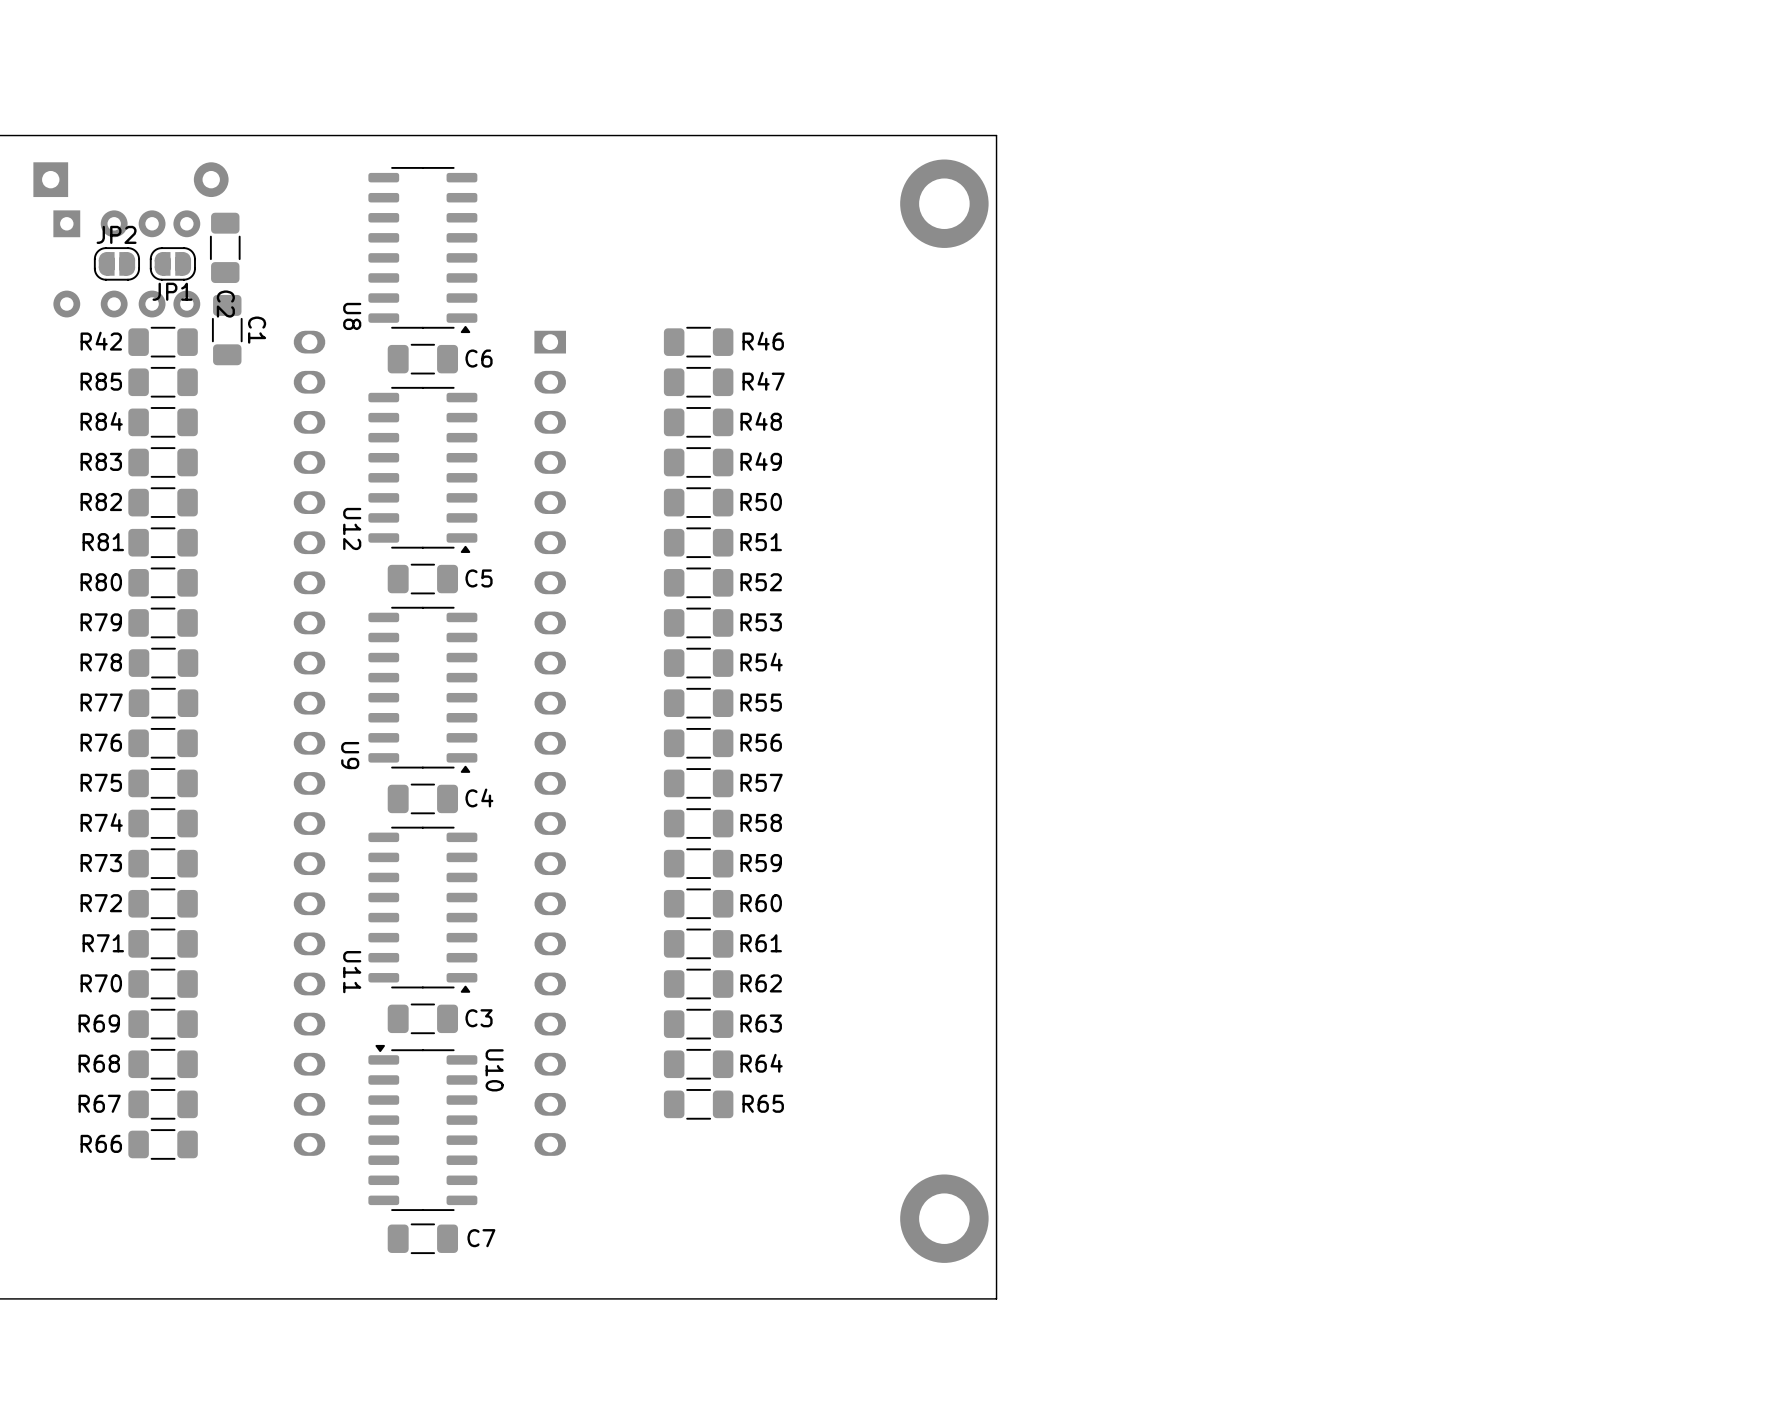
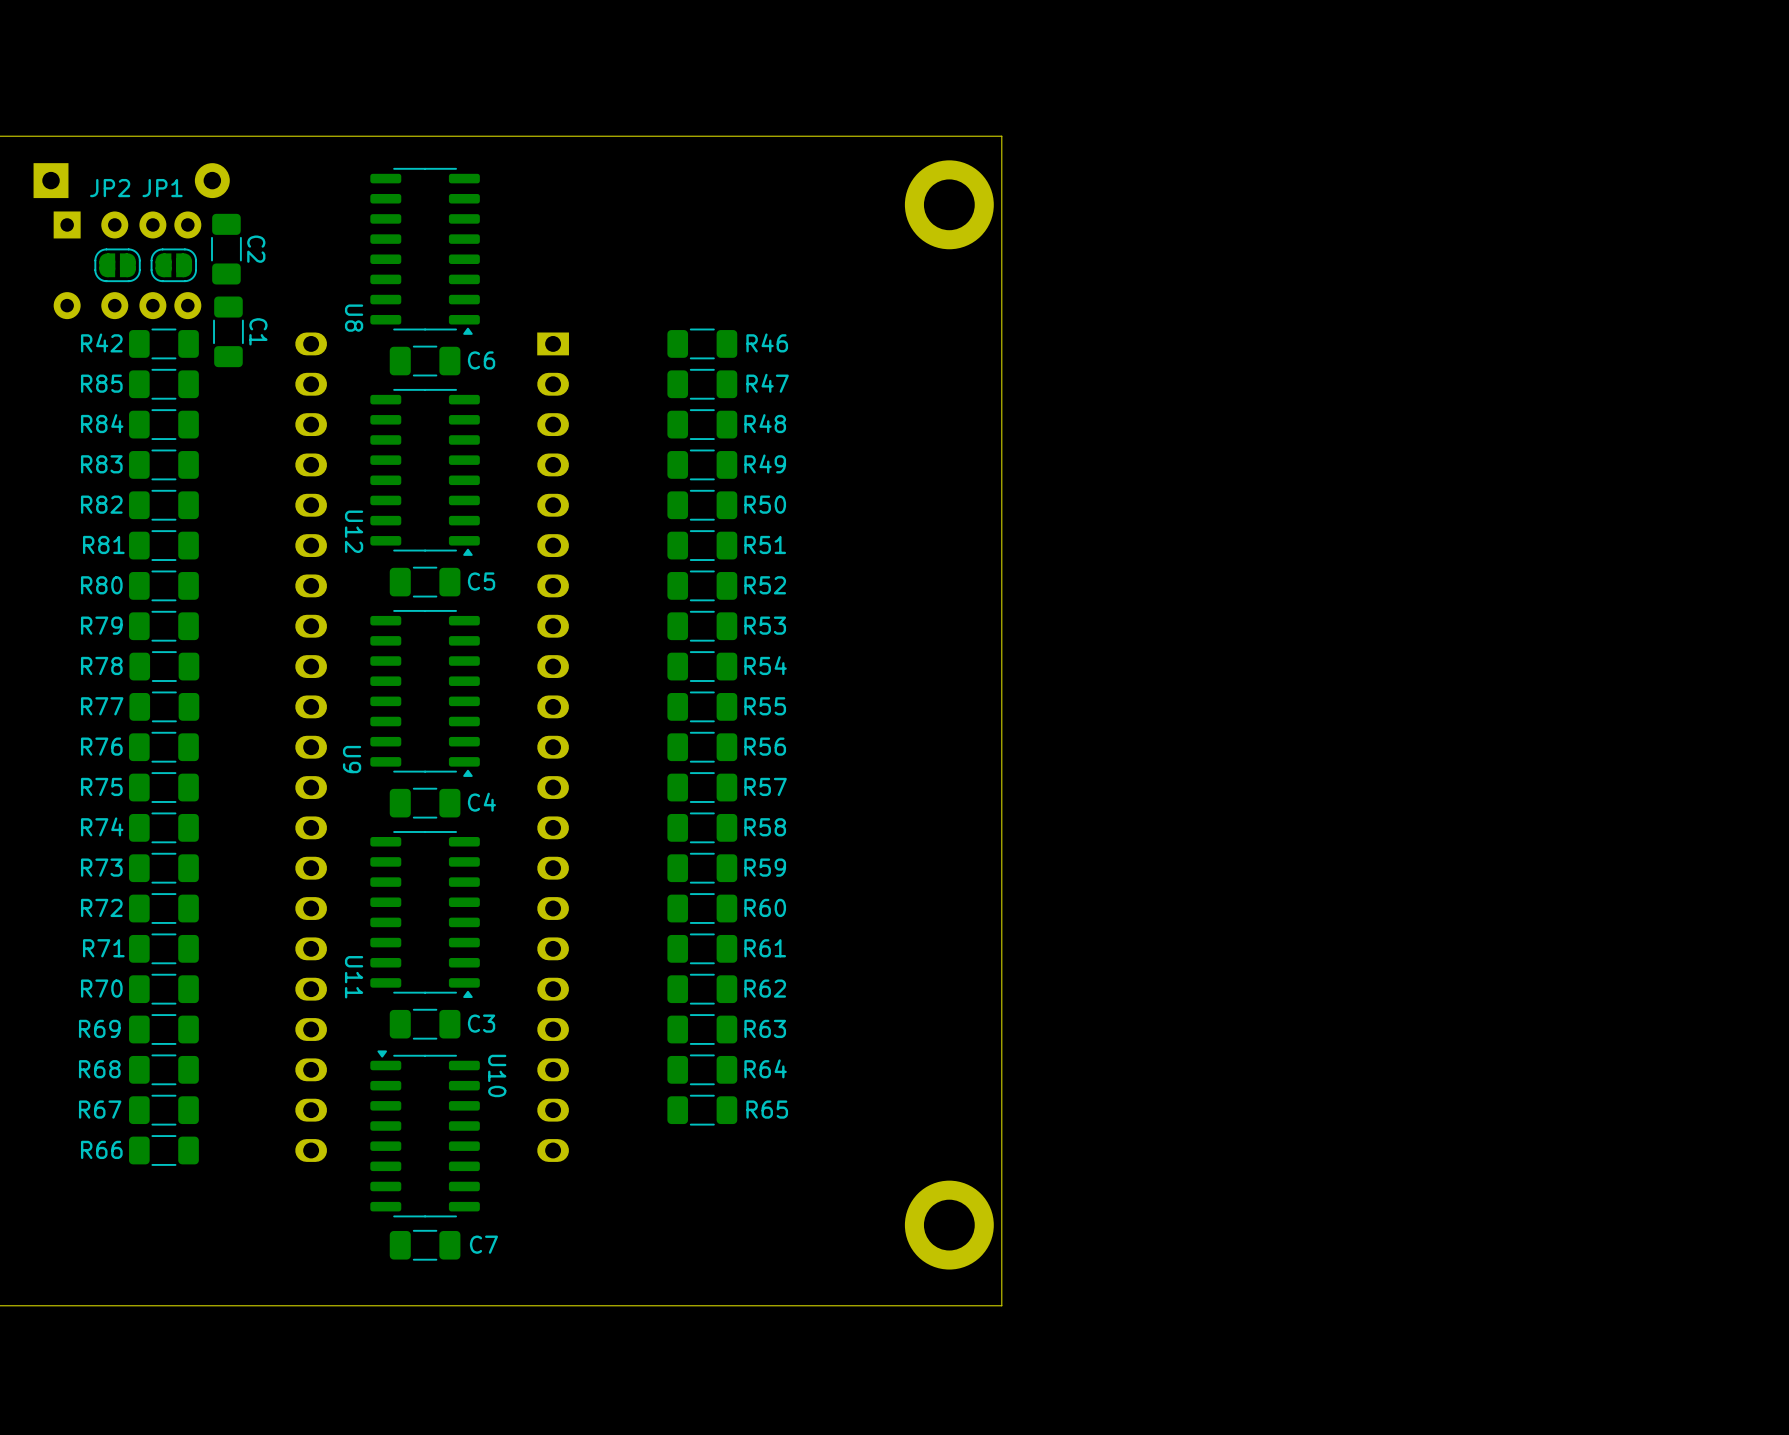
JP2 name position: JP2 (116, 234) -> JP2 (110, 188)
JP1 name position: JP1 (172, 291) -> JP1 (162, 188)
C2 name position: C2 (225, 304) -> C2 (256, 249)

